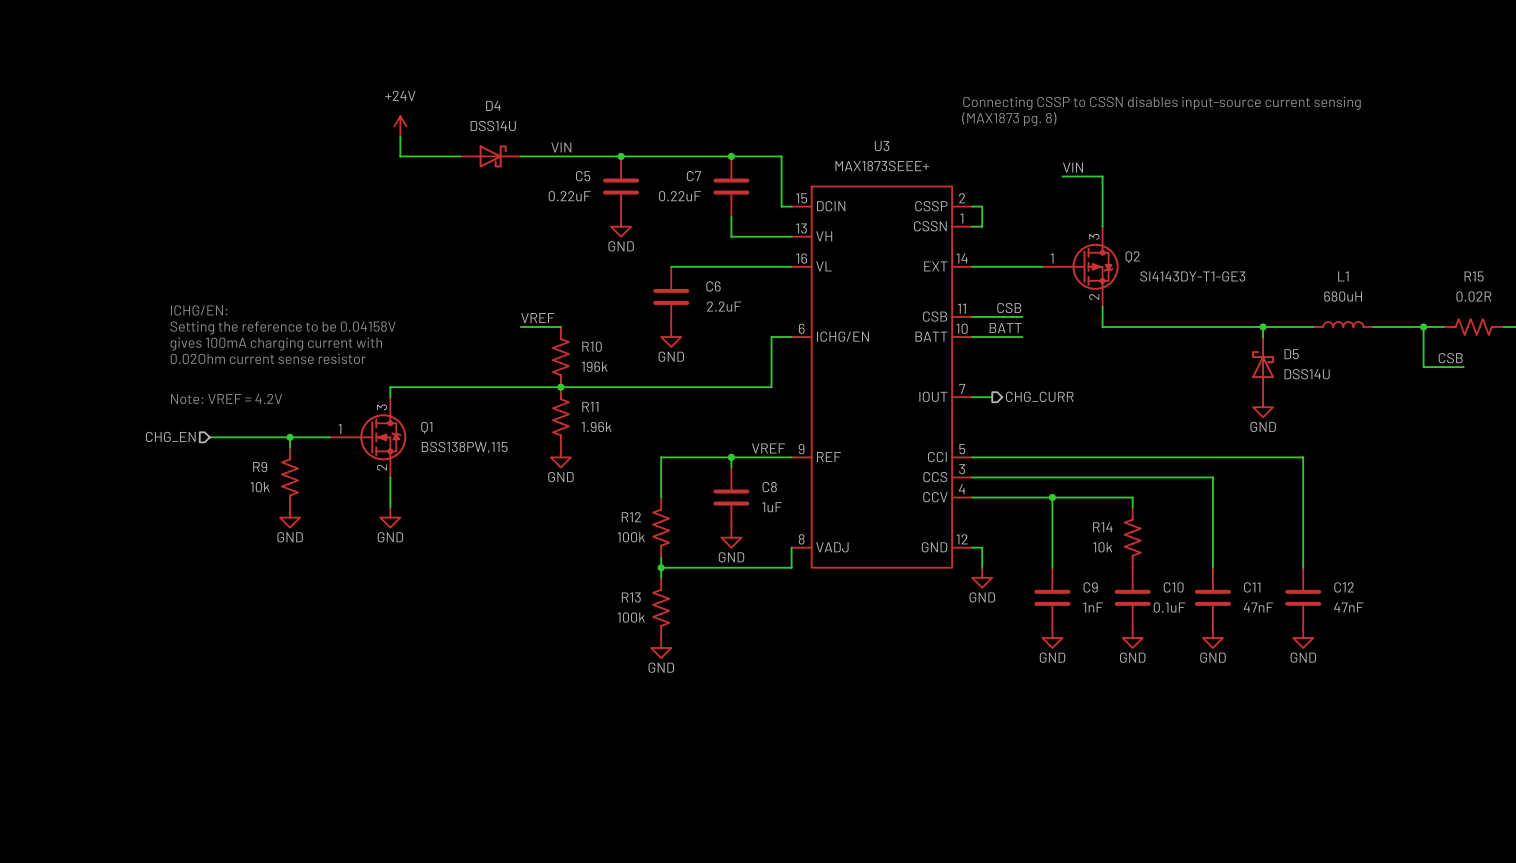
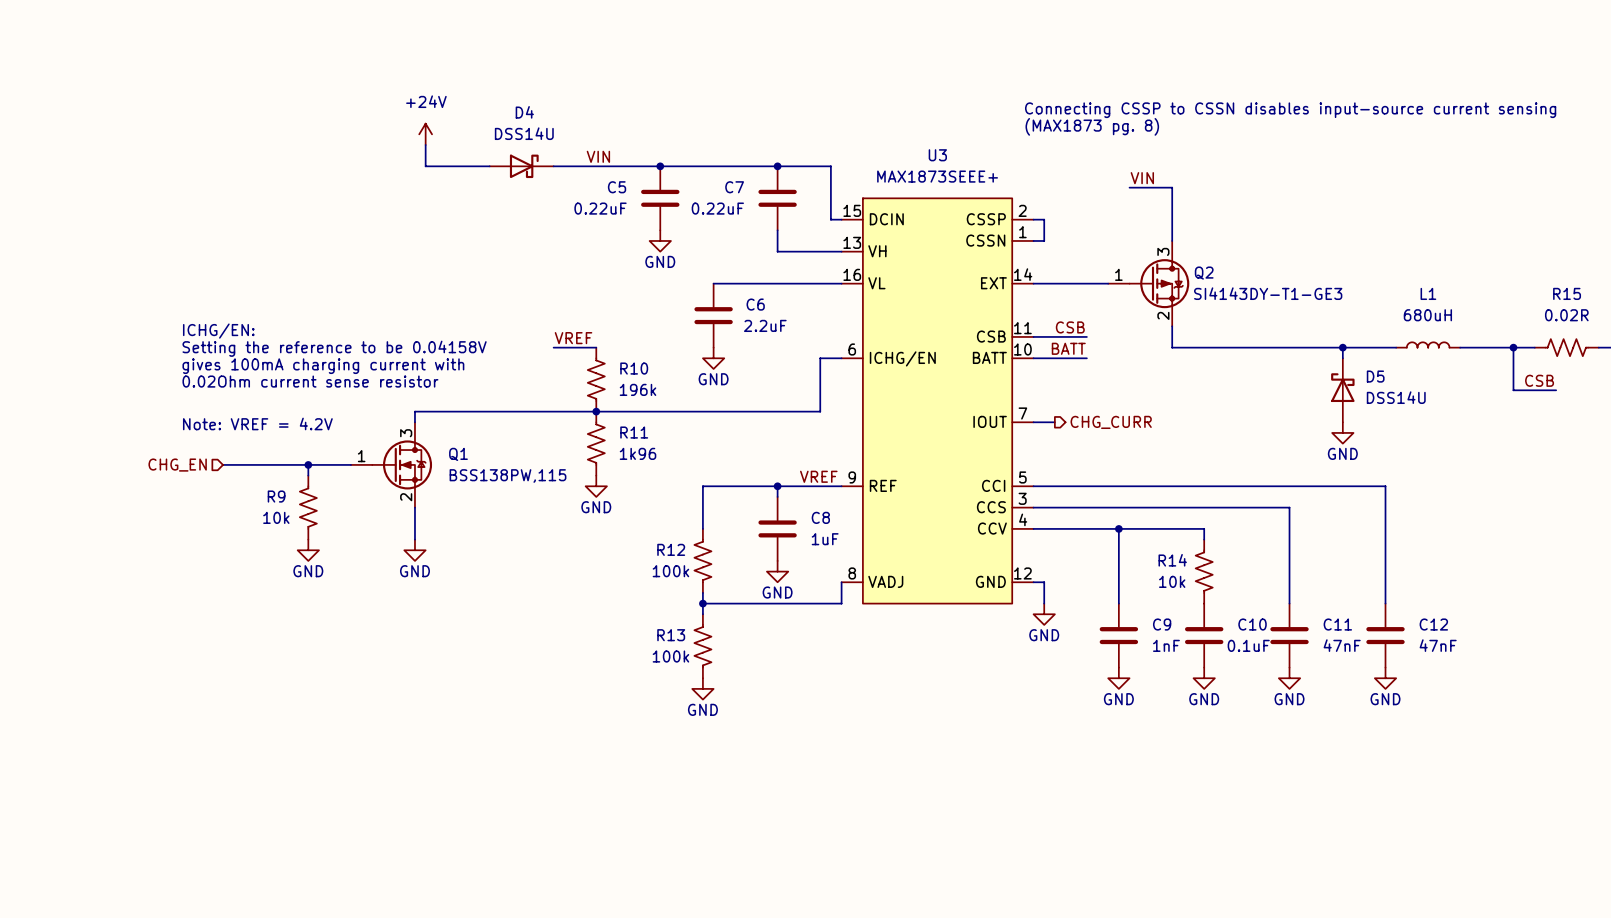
R11 value: 1.96k (596, 426) -> 1k96 (638, 453)

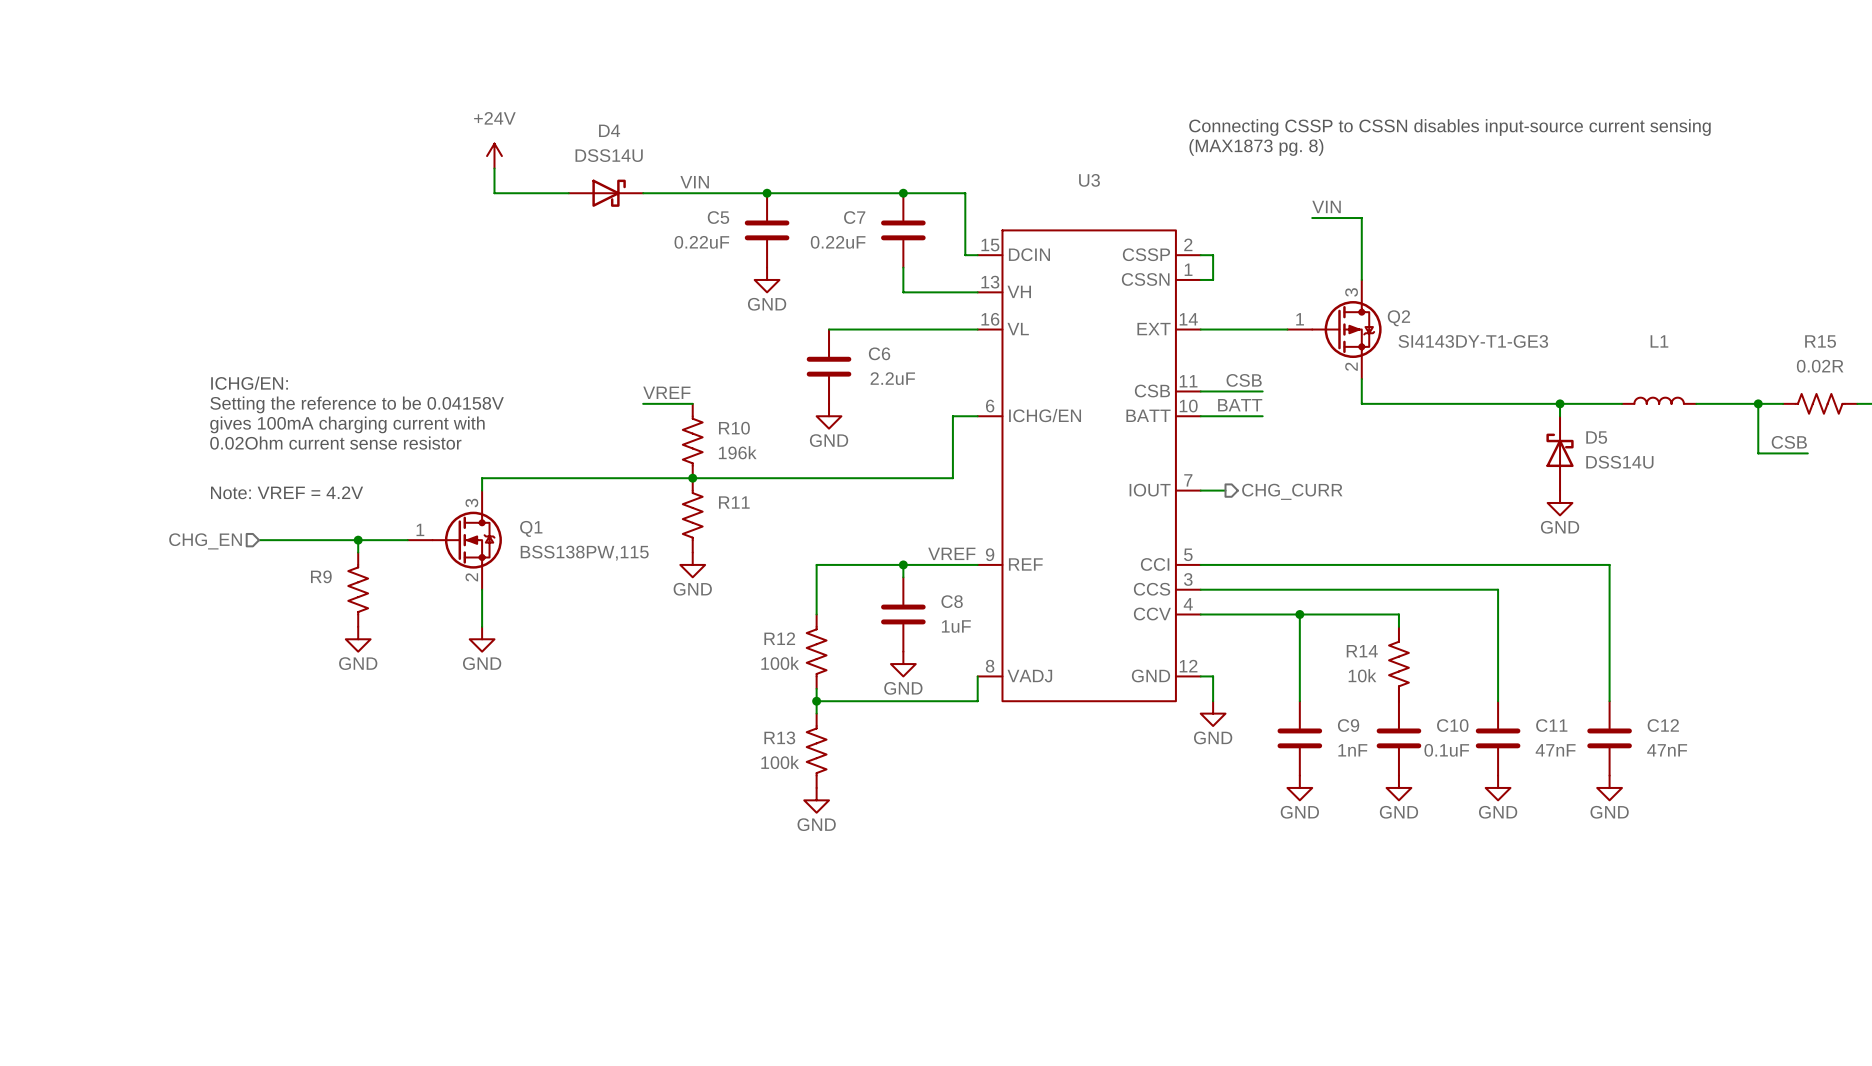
U3 value: MAX1873SEEE+ (937, 176) -> none
L1 value: 680uH (1427, 315) -> none
R11 value: 1k96 (638, 453) -> none
R9 value: 10k (276, 517) -> none

